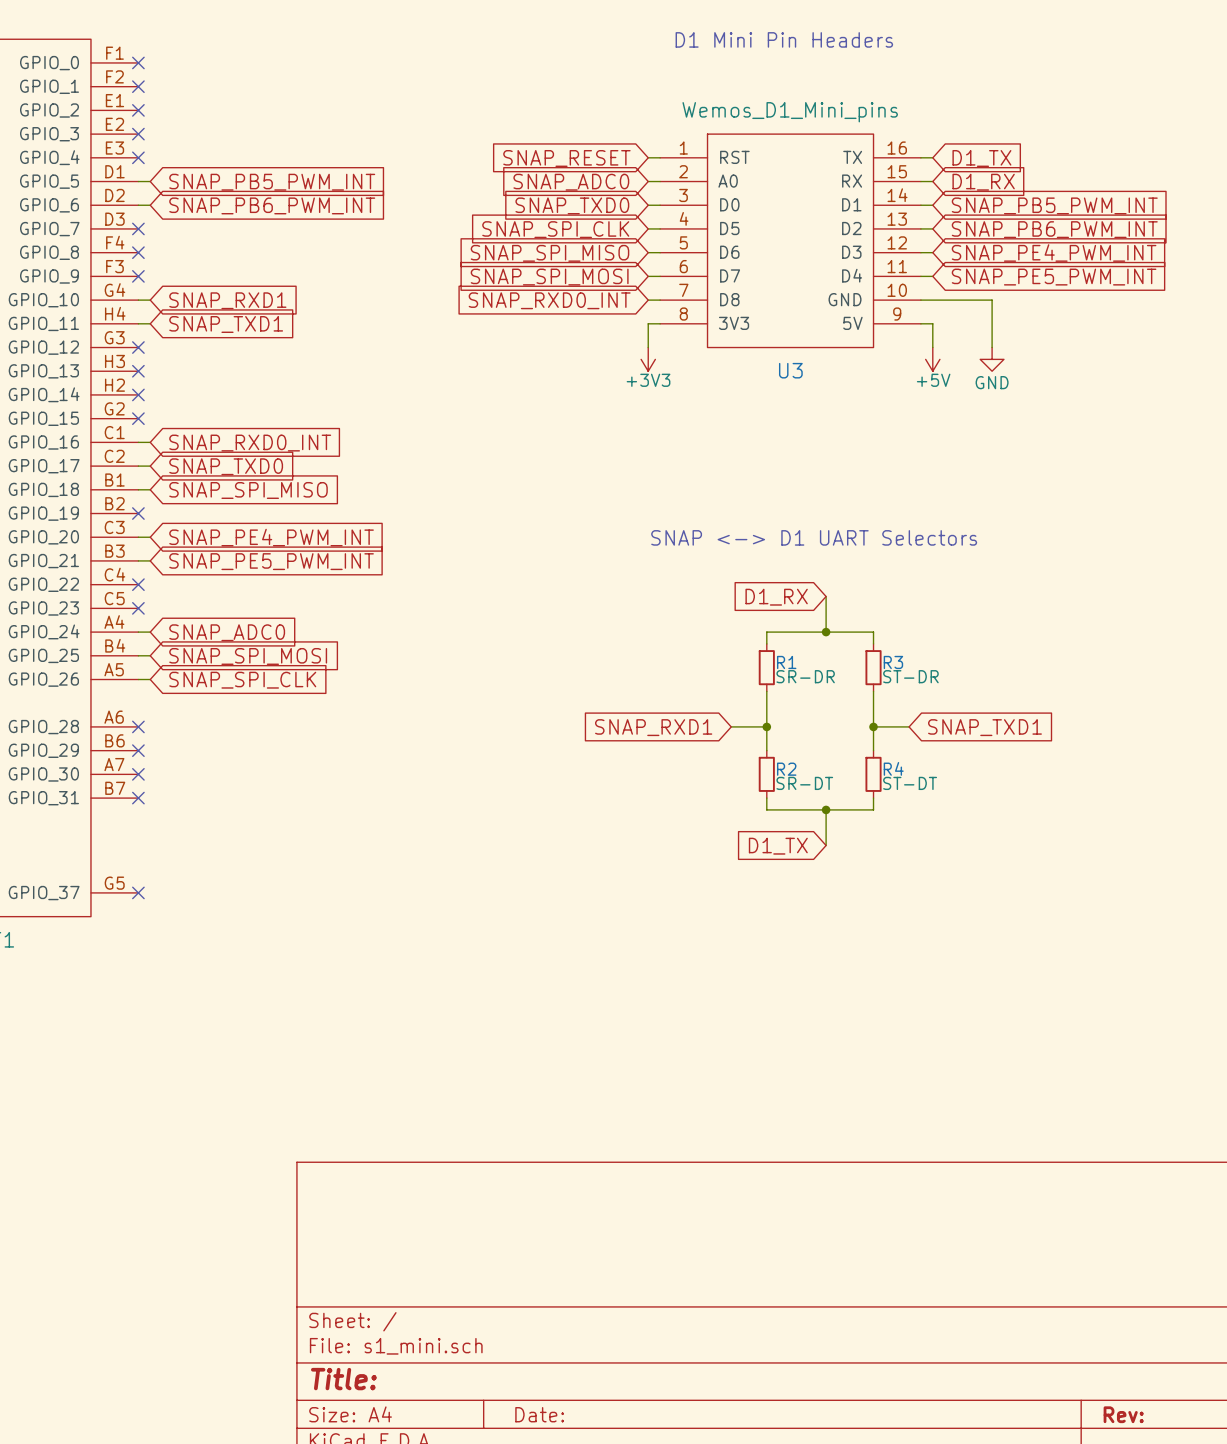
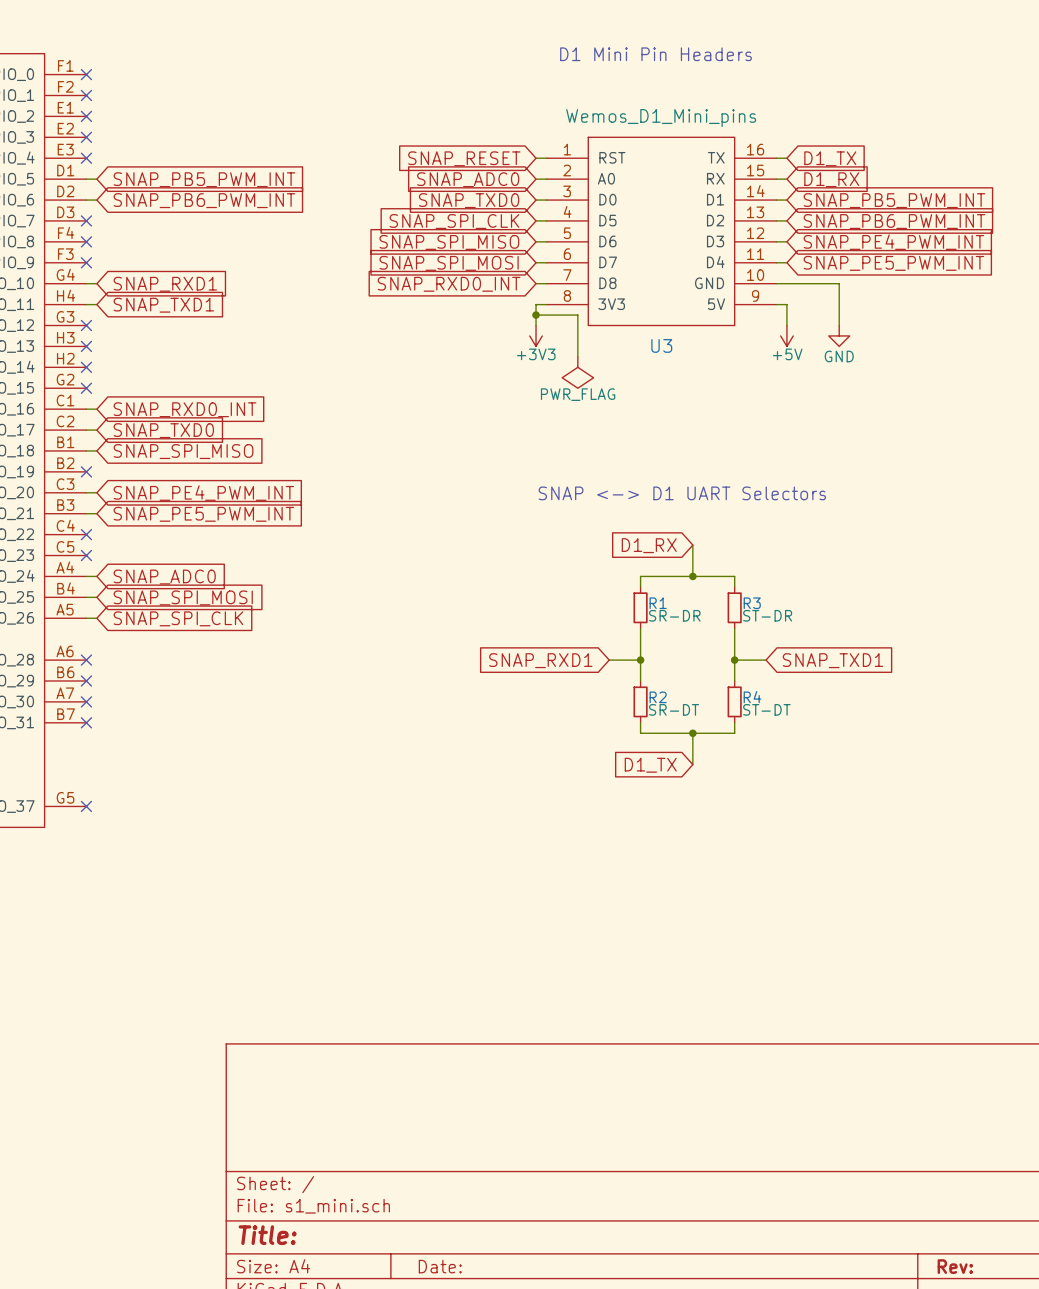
wire: none -> (536, 315) (577, 315) (577, 356)
junction: none -> (536, 315)
power symbol: none -> PWR_FLAG (577, 372)

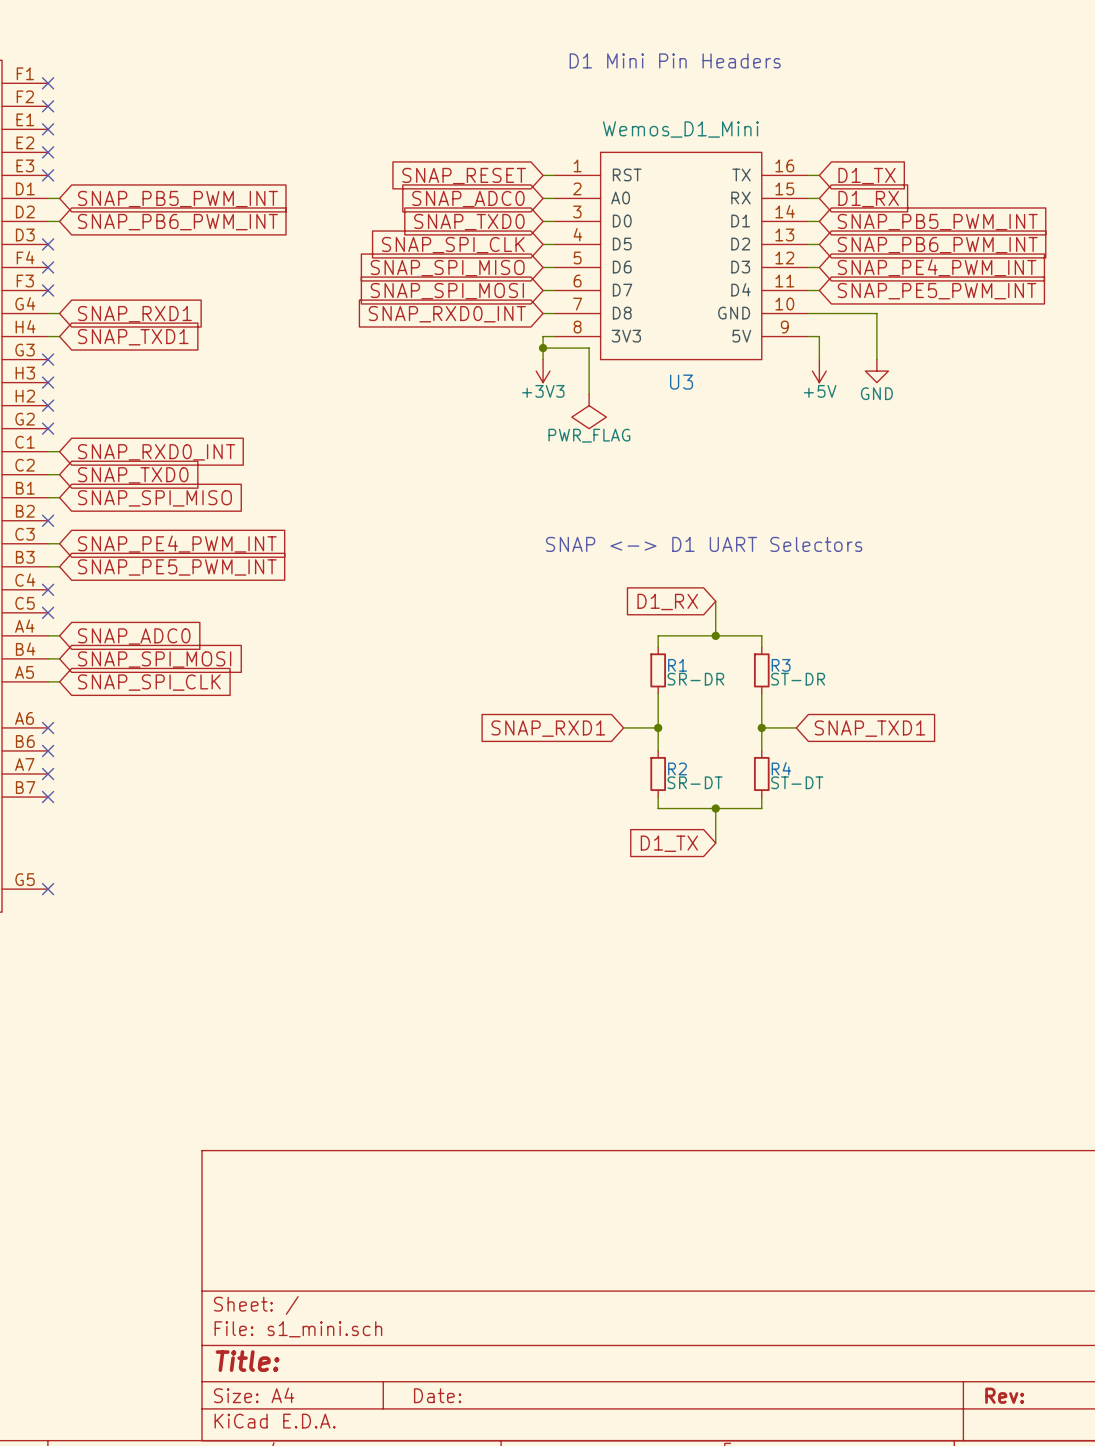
U3 value: Wemos_D1_Mini_pins (661, 118) -> Wemos_D1_Mini (680, 129)

